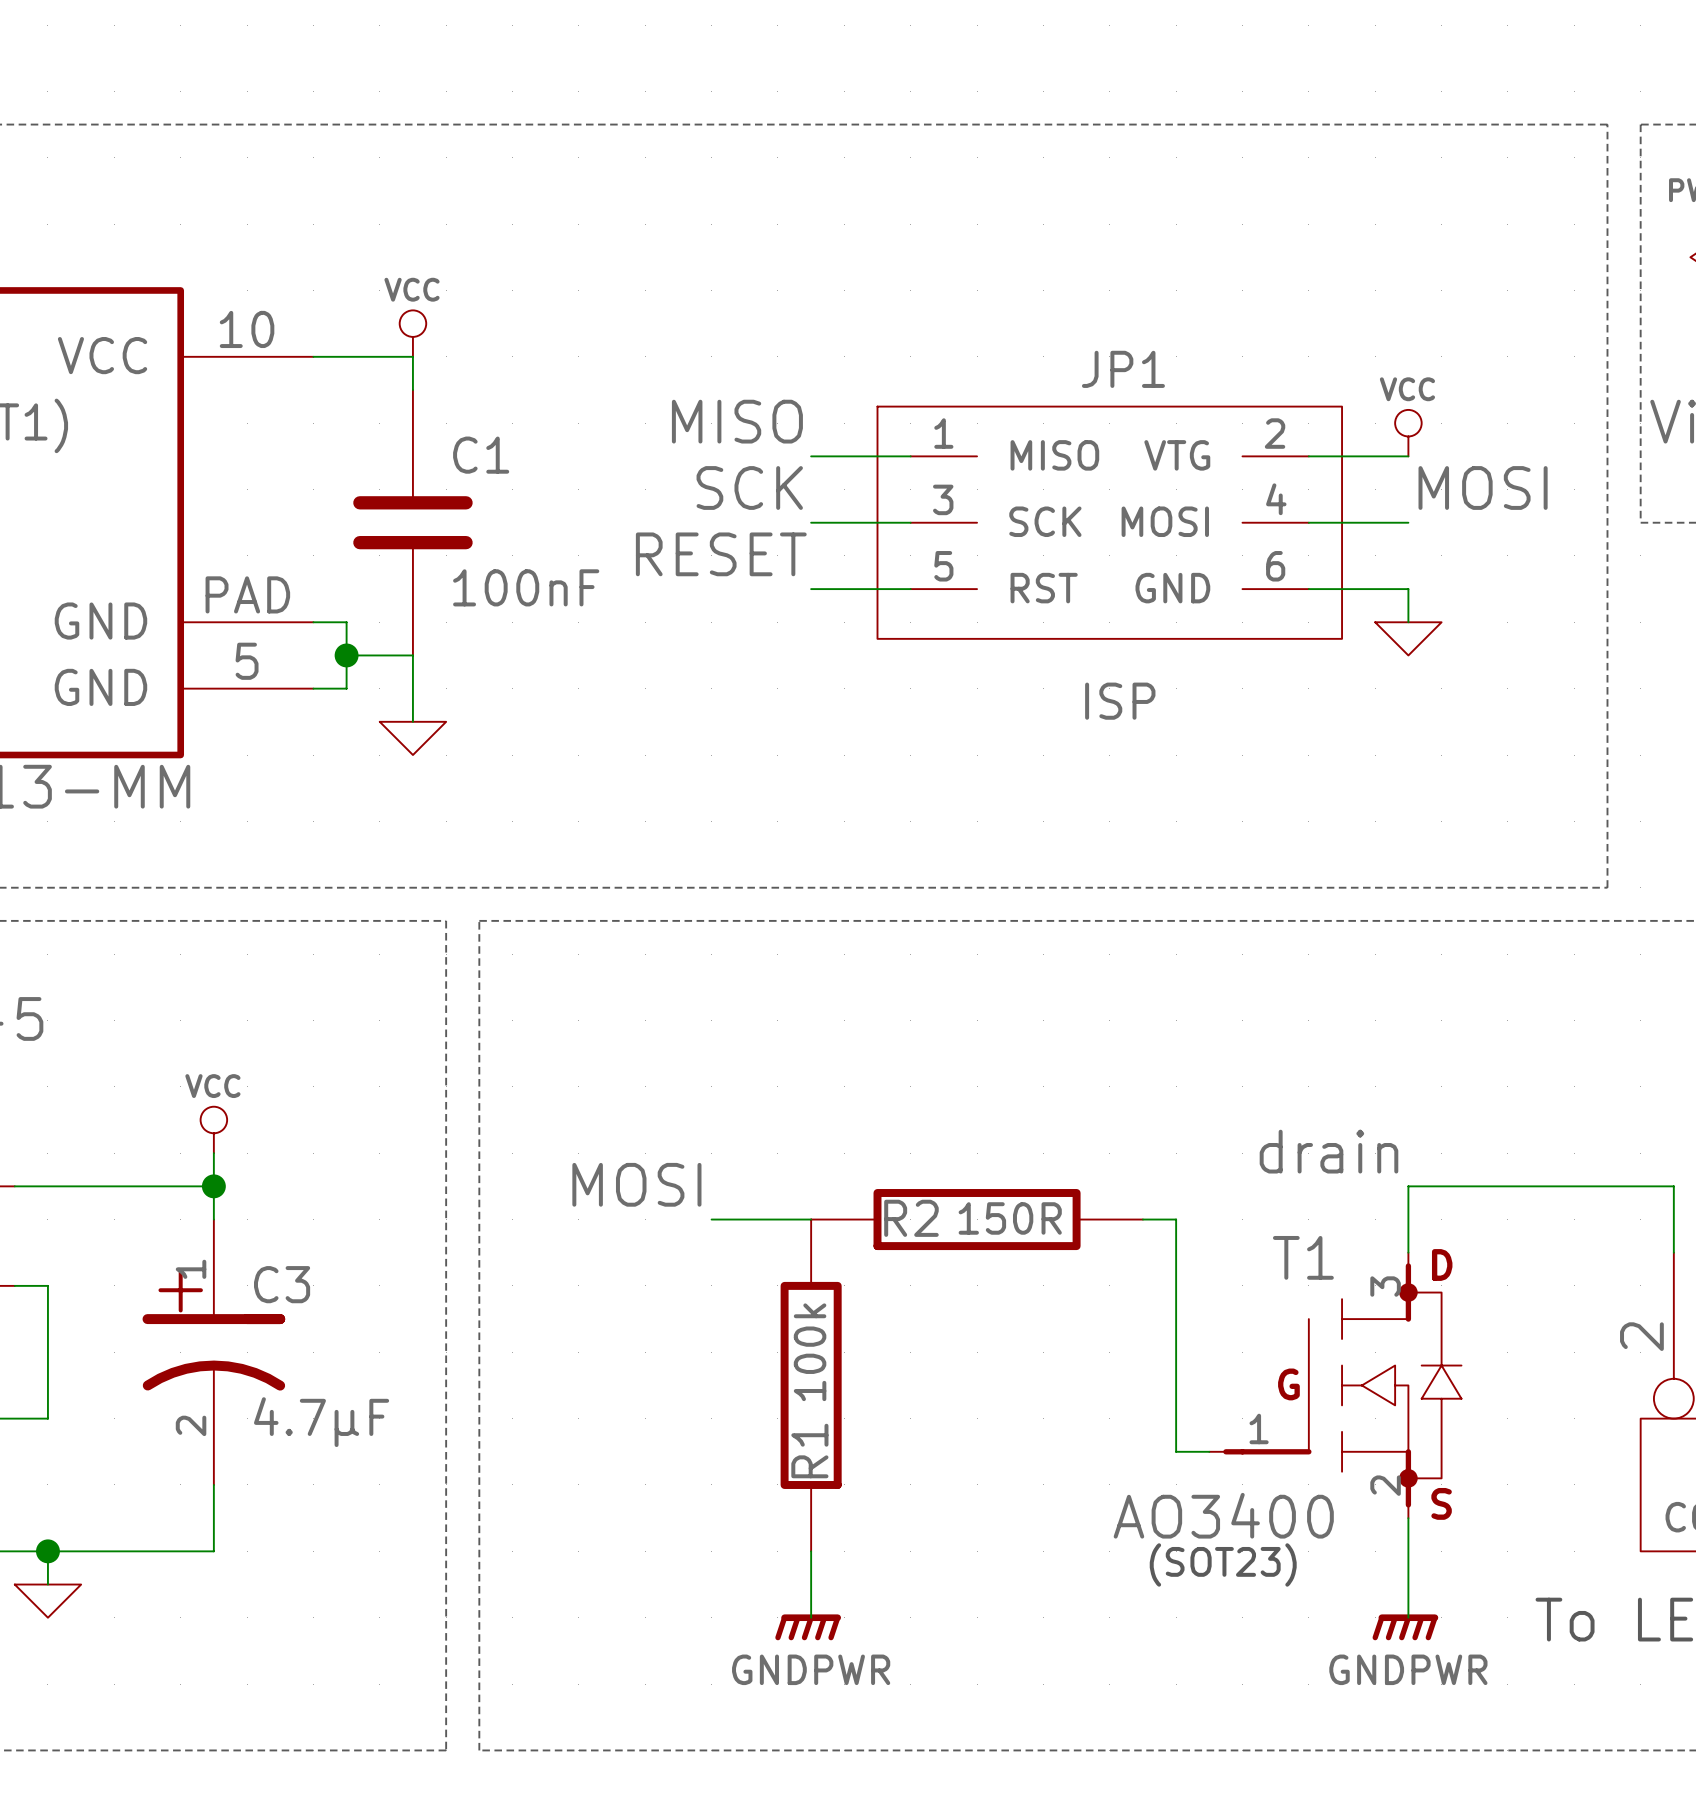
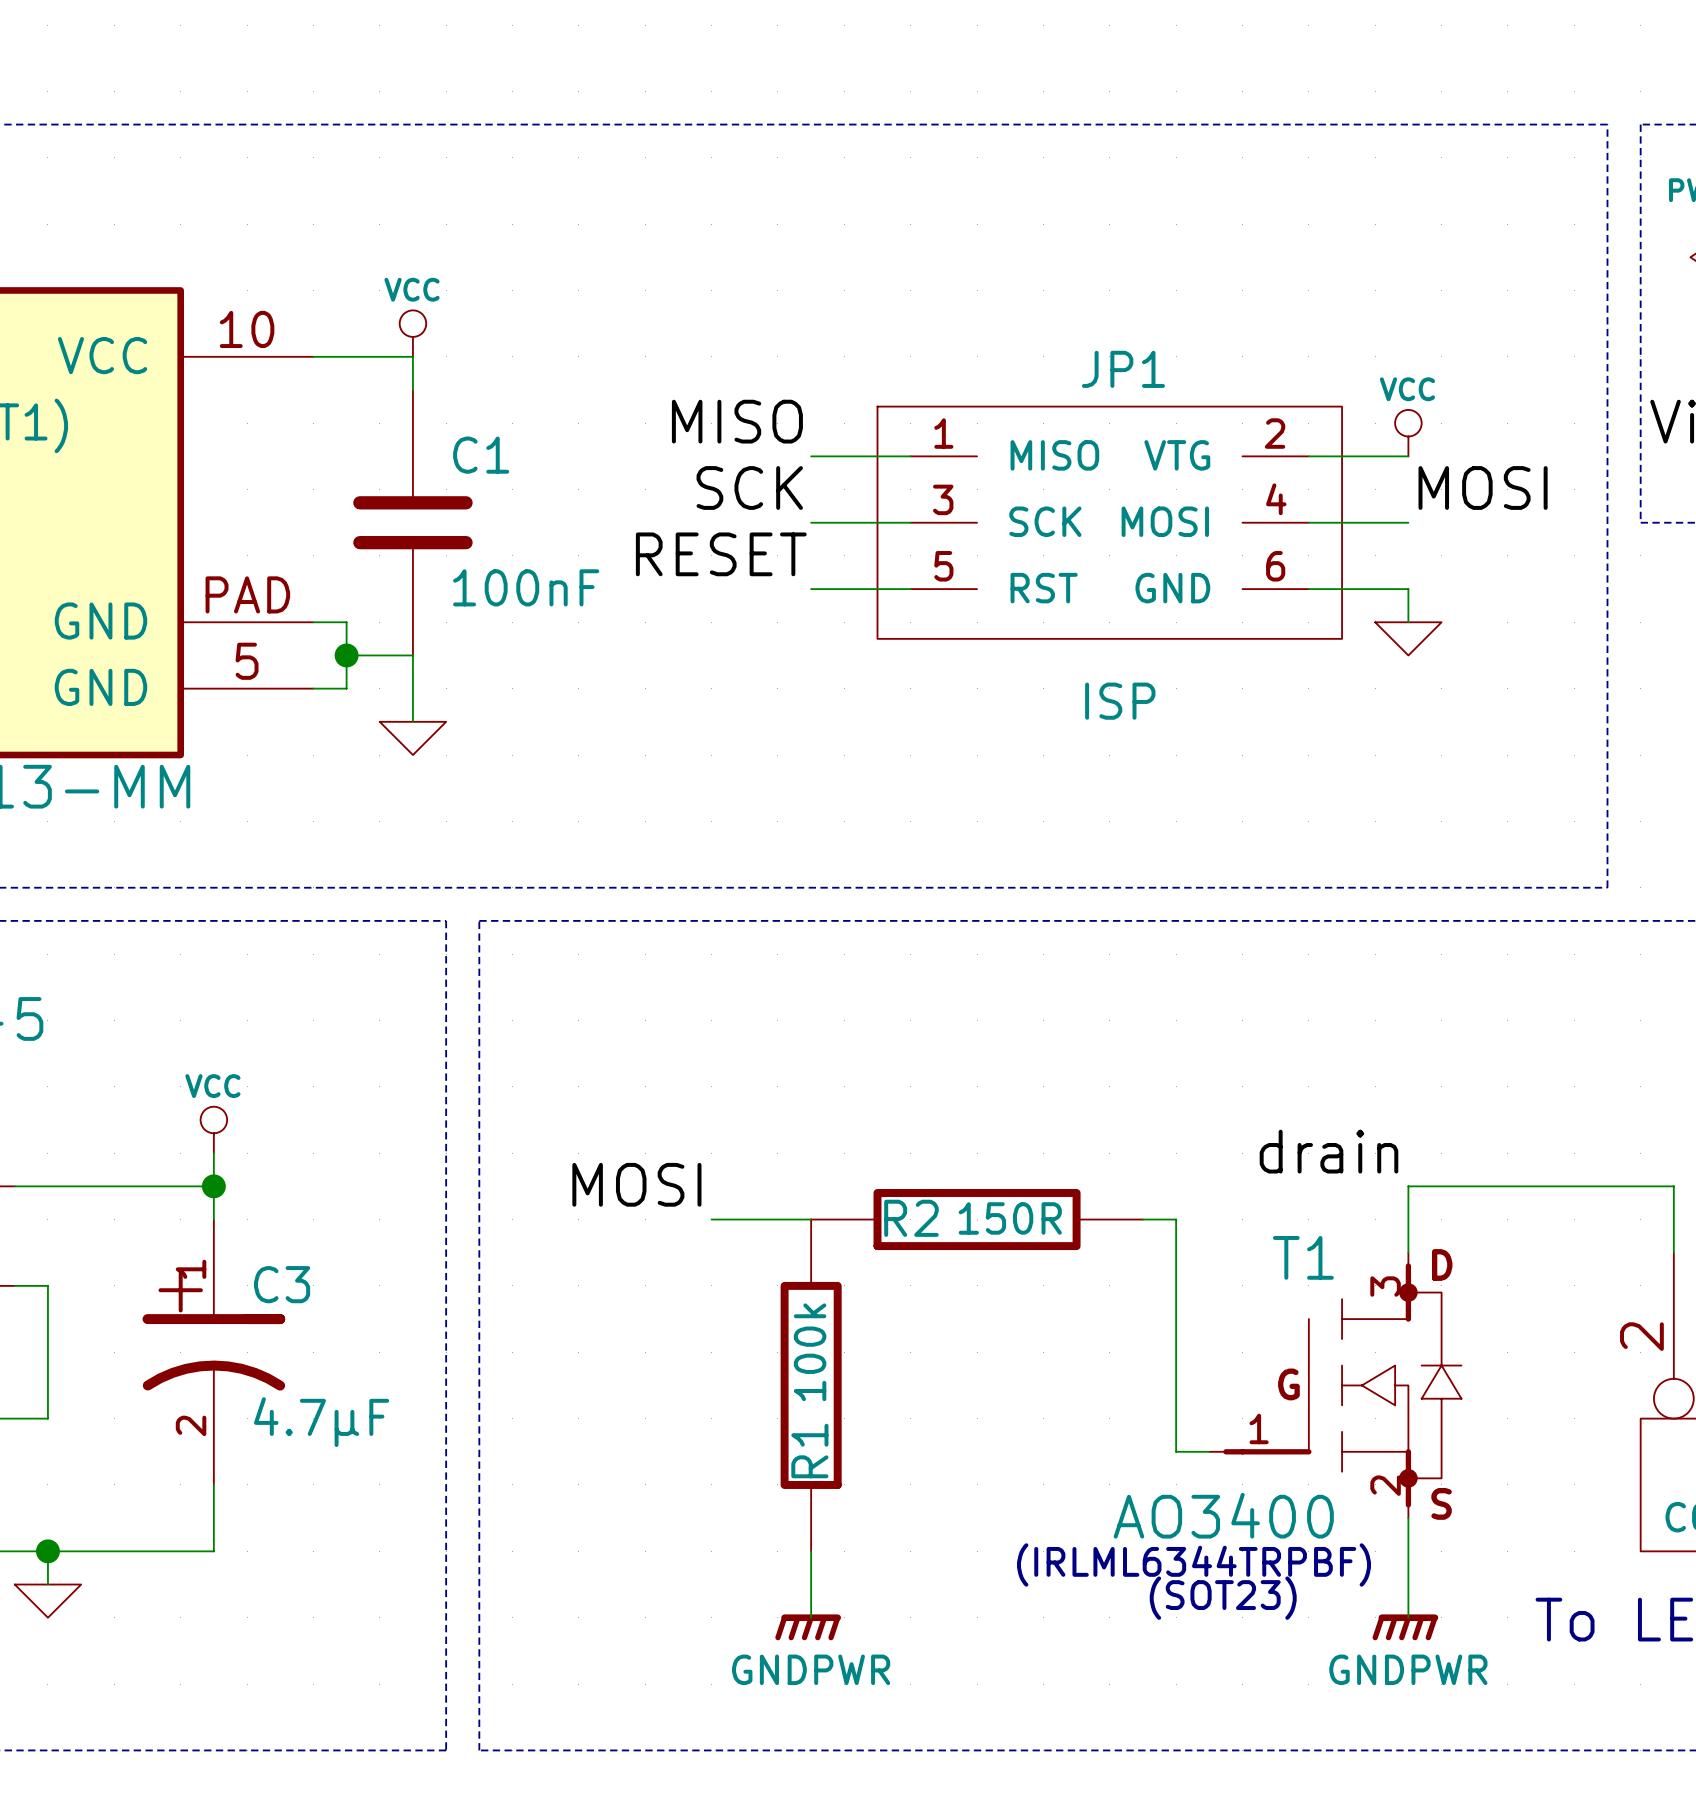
text: none -> (IRLML6344TRPBF) (1194, 1564)
text position: (SOT23) (1223, 1564) -> (SOT23) (1223, 1598)

